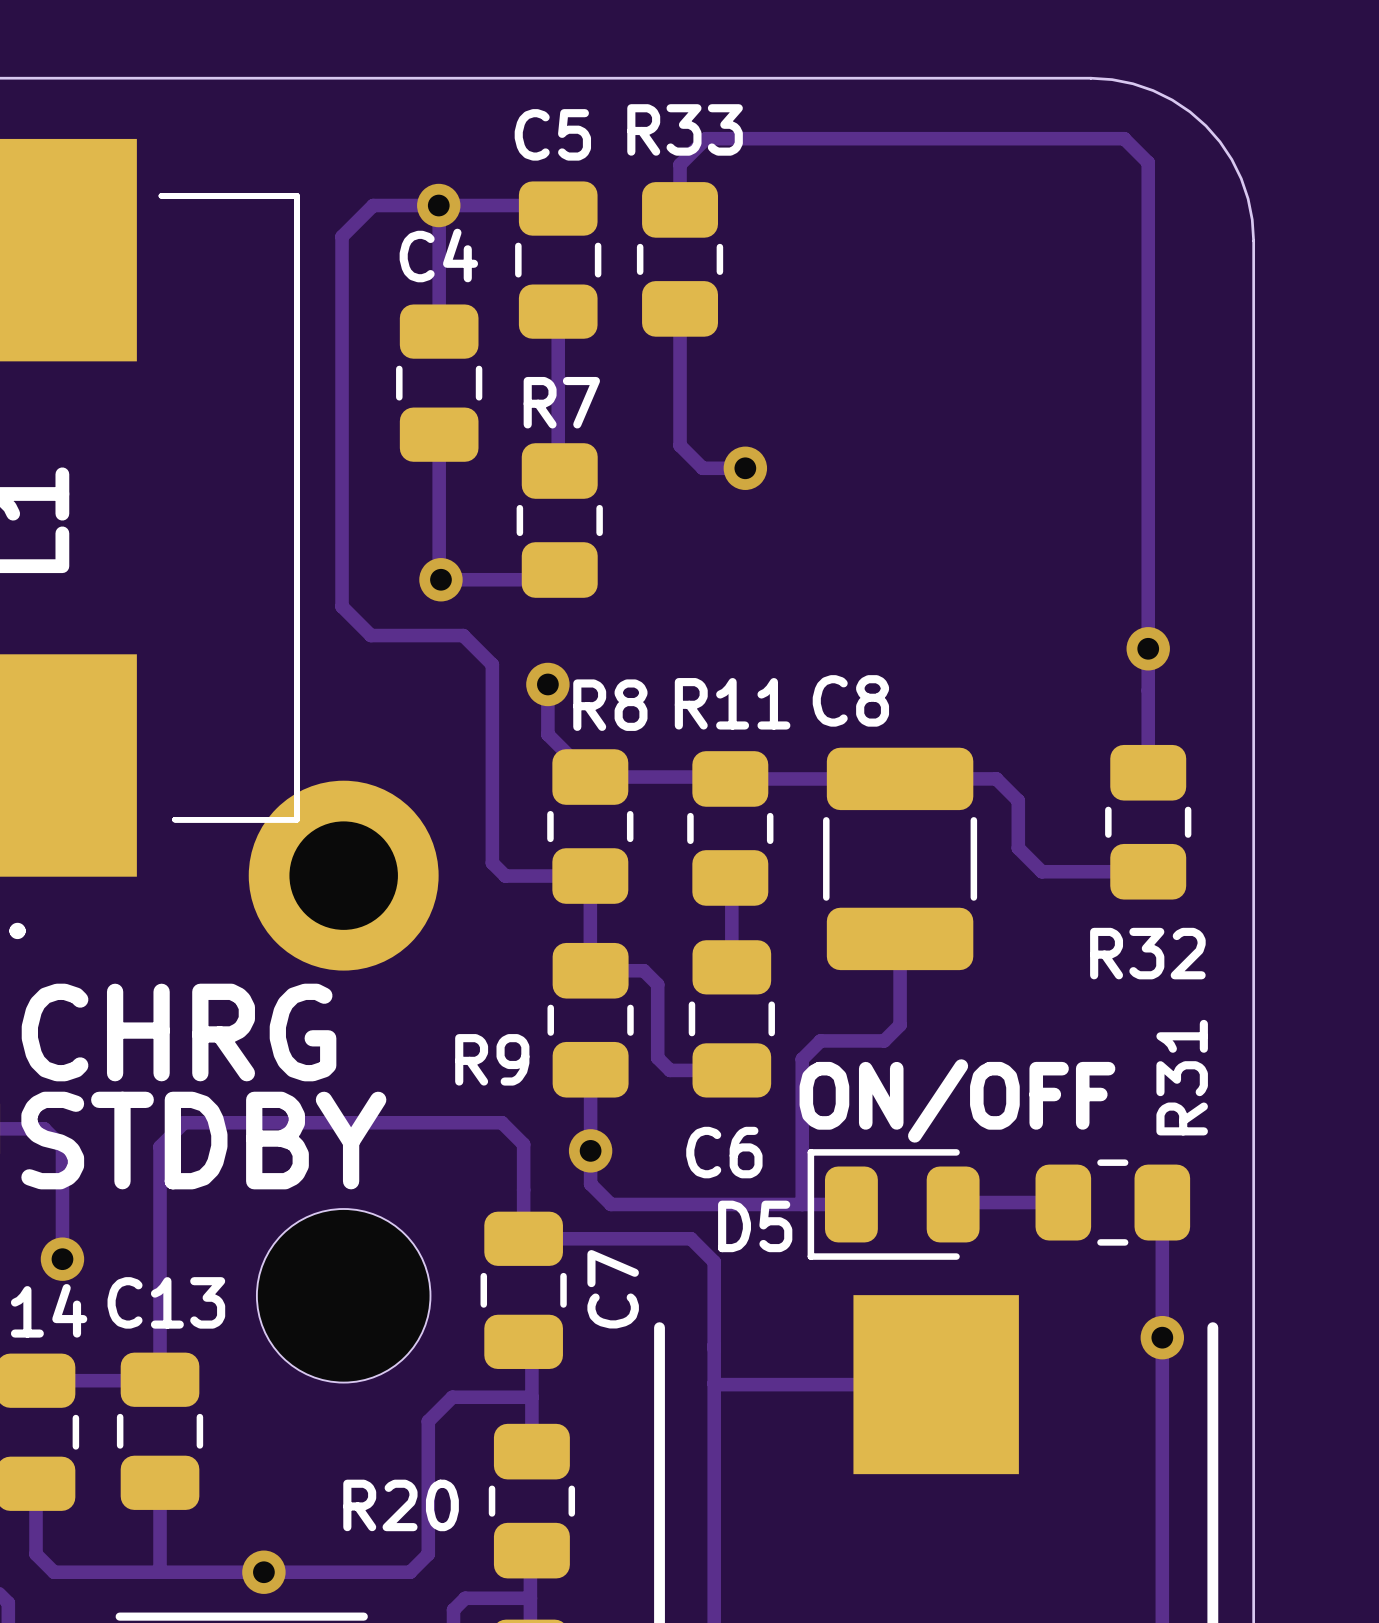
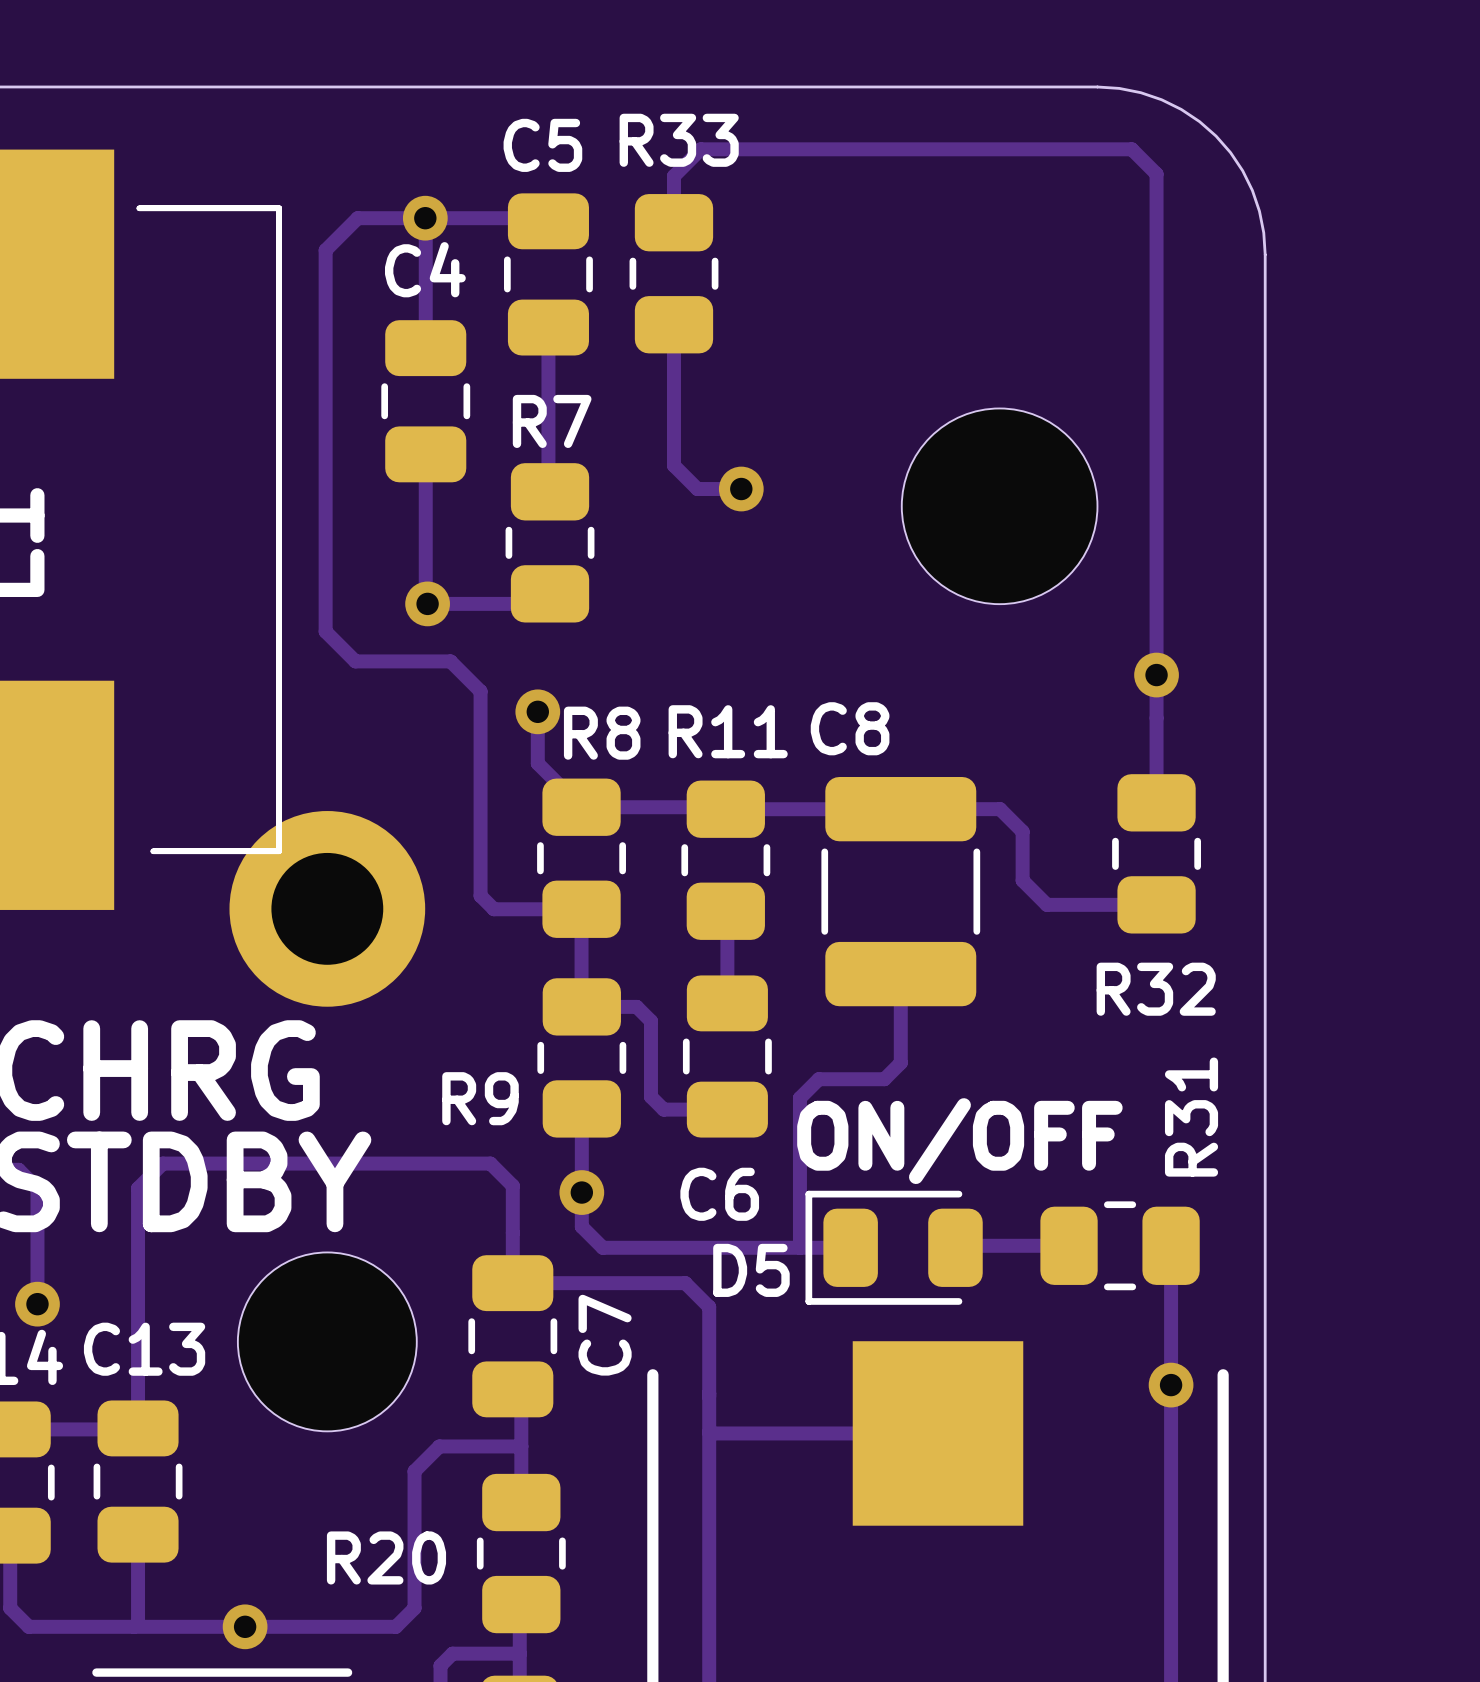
part: none -> (999, 506)

